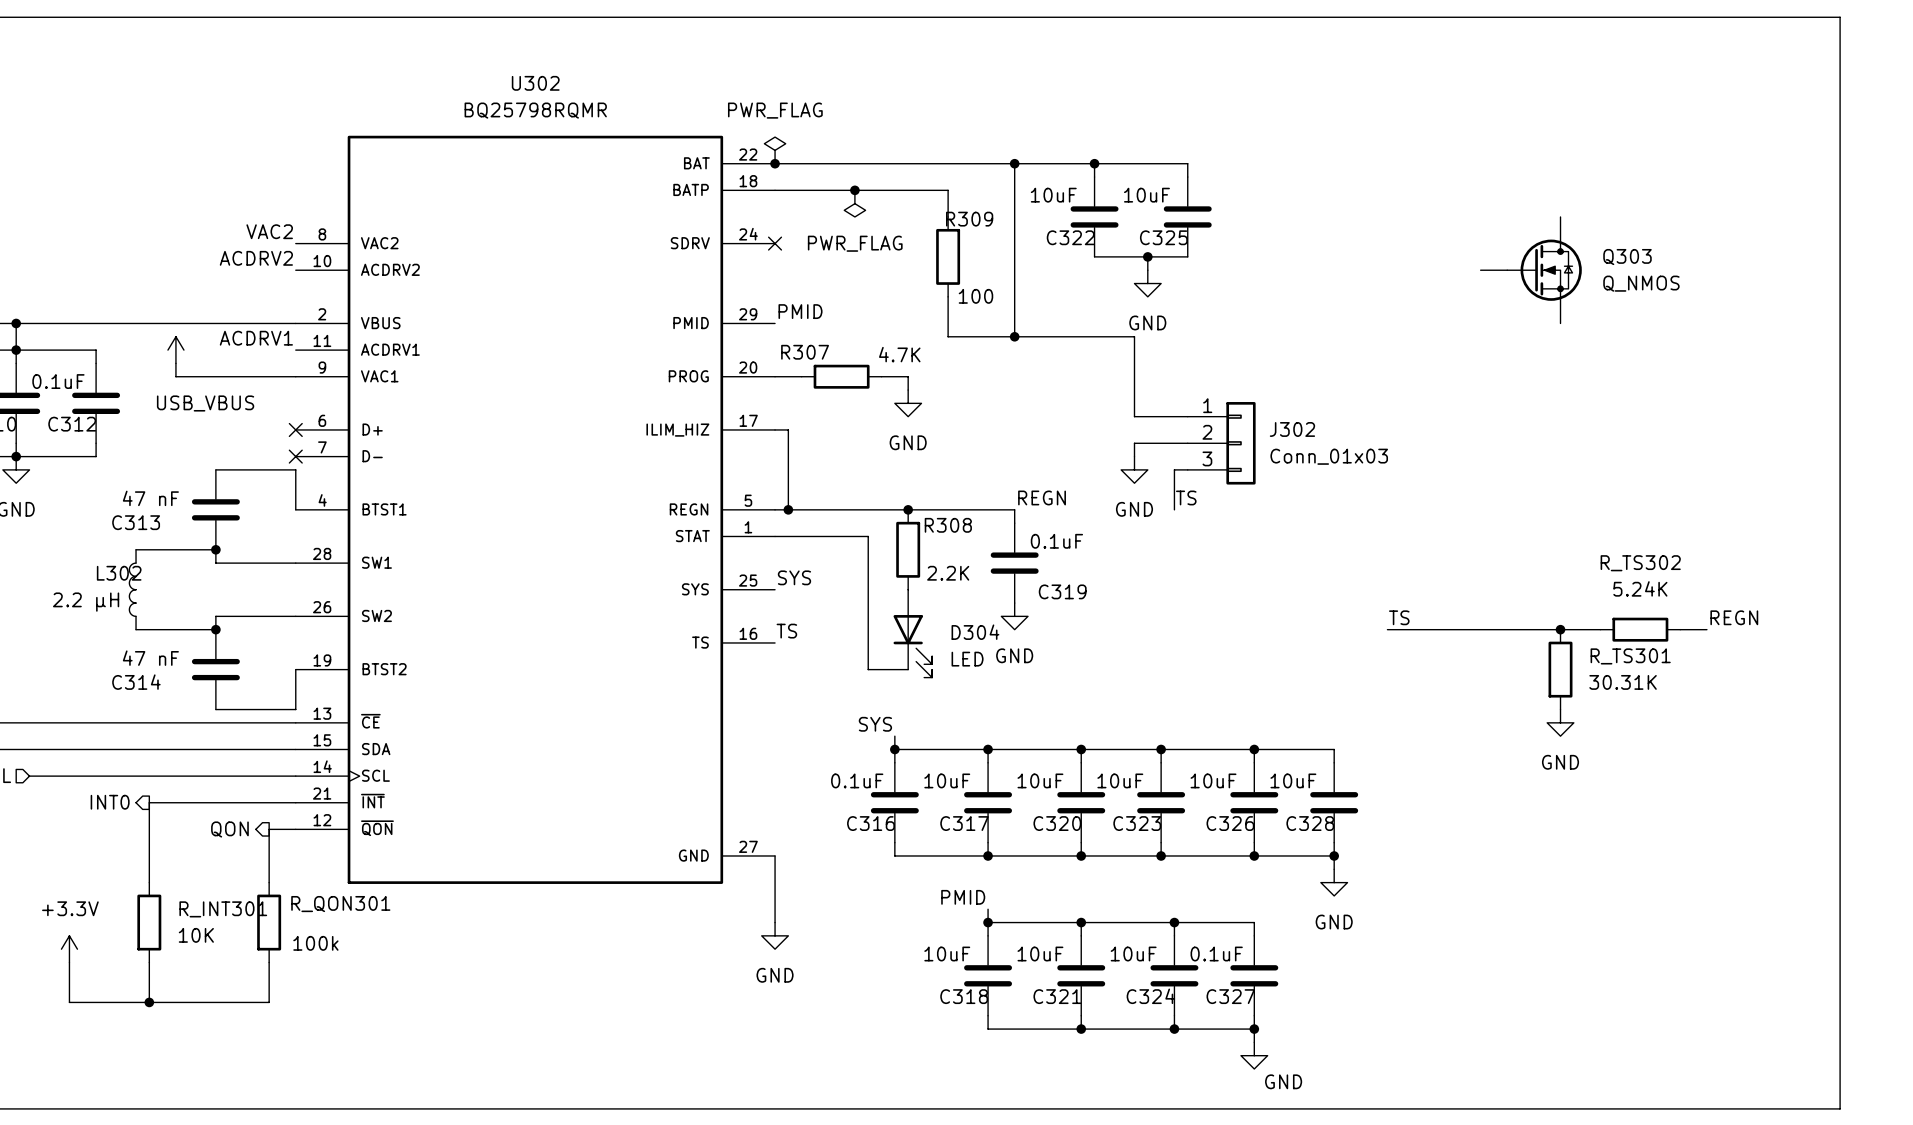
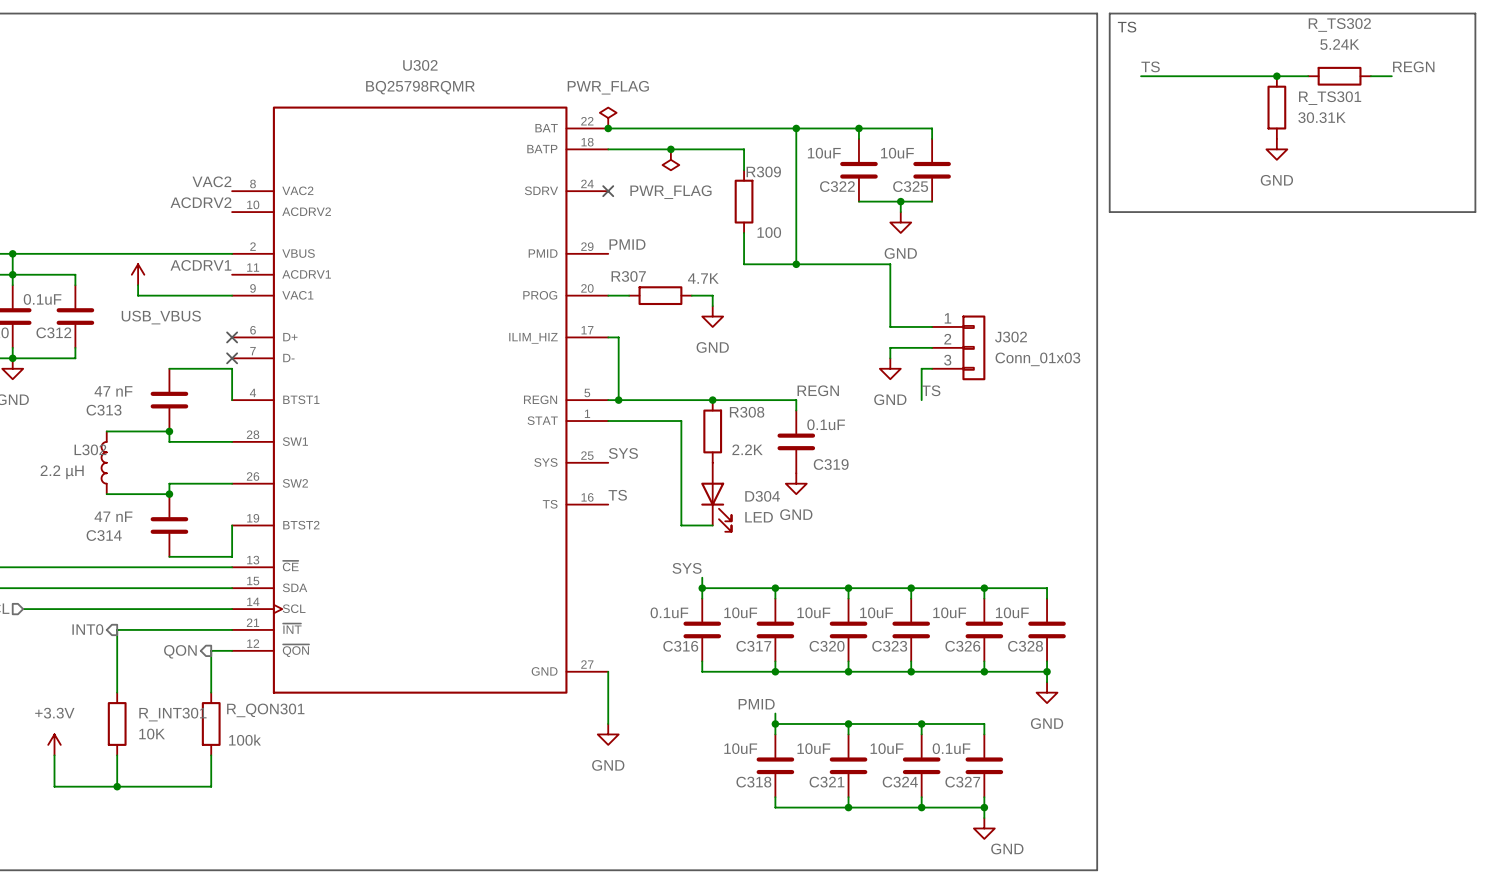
line: (1398, 17) (1414, 17) -> (1444, 13) (1475, 13) (1475, 212) (1109, 212) (1109, 13)
line: (1840, 17) (1840, 1108) (1398, 1108) -> (1097, 13) (1097, 870)
text: none -> TS (1127, 27)
label: none -> TS (1150, 66)
label: none -> REGN (1413, 66)
wire: none -> (1141, 76) (1308, 76)
junction: none -> (1276, 76)
wire: none -> (1370, 76) (1391, 76)
power symbol: none -> GND (1276, 149)
Q303: Q_NMOS (1531, 270) -> none
label: TS (1399, 617) -> none
label: REGN (1734, 617) -> none
wire: (1387, 629) (1600, 629) -> none
junction: (1560, 629) -> none
R_TS302 position: (1640, 629) -> (1339, 76)
wire: (1680, 629) (1706, 629) -> none
R_TS301 position: (1560, 669) -> (1276, 107)
power symbol: GND (1560, 722) -> none

